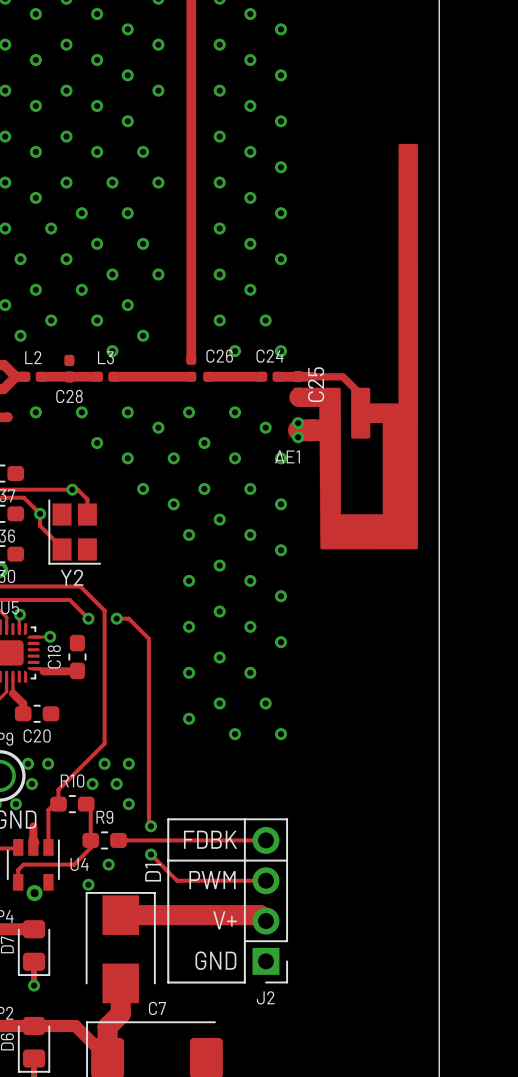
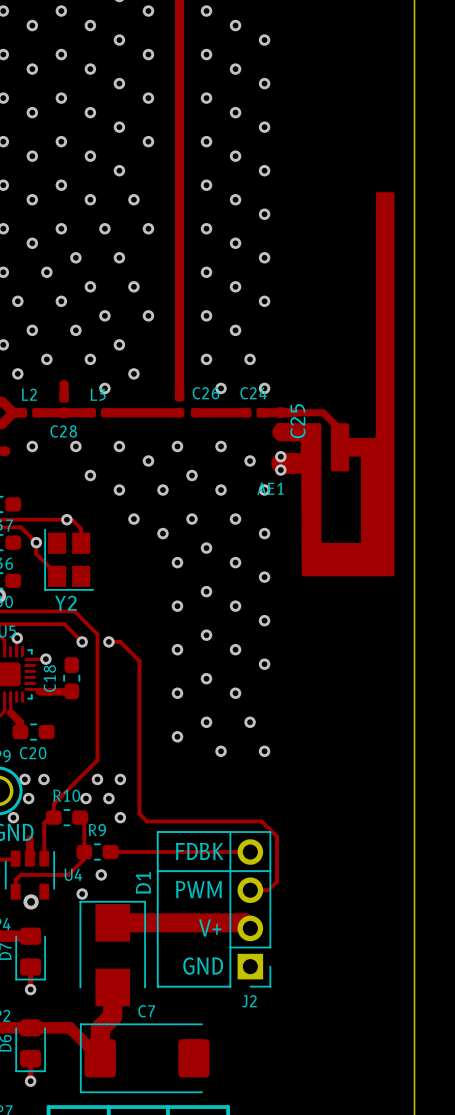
track: none -> (64, 384) (64, 397)
track: (148, 800) (148, 824) (150, 826) -> none
via: (150, 826) -> none
track: (150, 854) (177, 880) (265, 880) -> (139, 813) (147, 821) (261, 821) (276, 836) (276, 881) (268, 890) (250, 890)
via: (150, 854) -> none

